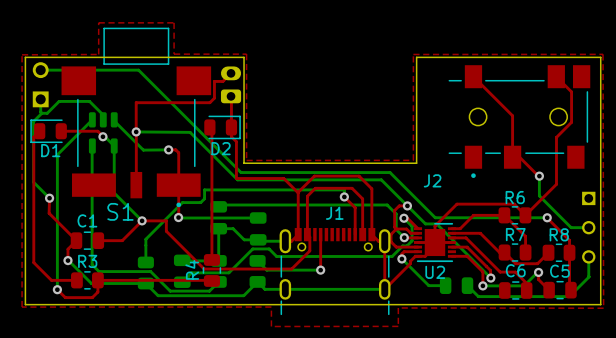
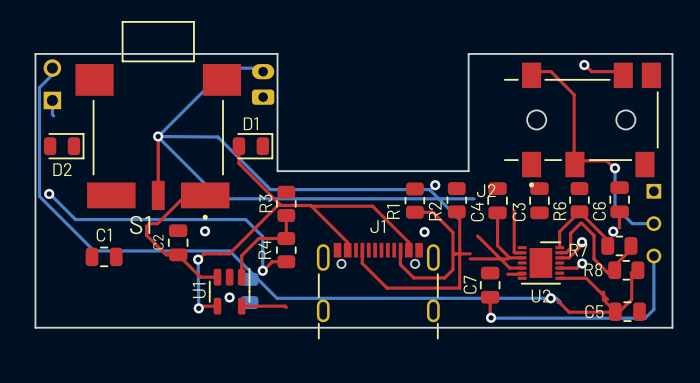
top zone outline: (98, 22) (98, 54) (22, 54) (22, 307) (271, 307) (271, 326) (398, 326) (398, 307) (603, 308) (603, 54) (413, 54) (413, 160) (246, 160) (246, 54) (174, 54) (174, 22) (98, 22) -> none
top track: none -> (584, 65) (591, 71) (622, 71)
via: none -> (584, 65)
bottom track: (40, 70) (138, 70) (241, 172) (390, 172) (435, 217) (547, 217) -> none
bottom track: none -> (261, 68) (226, 68) (157, 136) (219, 198) (474, 198)
top track: (231, 73) (222, 81) (214, 81) (214, 98) (209, 102) (136, 102) (136, 131) -> none
top track: none -> (530, 71) (551, 71) (574, 94) (574, 160) (606, 160) (614, 168)
bottom track: none -> (51, 75) (39, 87) (39, 196) (94, 250) (229, 250) (277, 298) (556, 298) (558, 302) (560, 302) (558, 300)
top track: (473, 76) (512, 115) (512, 157) (519, 157) (538, 176) -> none
top track: (556, 76) (571, 91) (571, 122) (556, 137) (556, 184) (525, 215) (514, 204) (456, 204) (434, 226) (434, 246) (425, 256) (415, 256) (384, 289) (384, 241) (378, 241) (371, 234) (371, 188) (359, 176) (314, 176) (298, 192) (298, 234) (291, 241) (285, 241) -> none
top track: (231, 96) (231, 136) (236, 141) (236, 178) (283, 178) (298, 192) -> none
bottom track: (92, 119) (57, 154) (57, 289) -> none
bottom track: (103, 119) (103, 115) (89, 101) (59, 101) (47, 113) (41, 113) (33, 121) (33, 182) (49, 198) -> none
bottom track: (114, 119) (143, 150) (168, 150) -> none
top track: (209, 127) (211, 129) (211, 259) -> none
D2 position: (222, 127) -> (64, 146)
top track: (39, 131) (33, 137) (33, 262) (51, 280) (76, 280) -> none
D1 rotation: 0° (48, 131) -> 180° (252, 146)
D1 position: (48, 131) -> (252, 146)
U1 side: bottom (103, 132) -> top (229, 291)
top track: (64, 134) (61, 131) (97, 131) (102, 136) -> none
bottom track: (102, 136) (114, 146) (114, 193) (142, 220) -> none
via: (102, 136) -> none
top track: none -> (238, 146) (238, 163) (280, 205) (310, 205) (347, 242) (347, 252)
bottom track: (92, 146) (92, 264) (98, 271) (150, 271) (170, 291) (209, 291) (218, 281) -> none
top track: (168, 149) (175, 149) (178, 152) (178, 217) -> none
via: (168, 149) -> none
bottom track: none -> (615, 168) (615, 206) (632, 223) (653, 223)
via: none -> (435, 185)
bottom track: (539, 176) (539, 195) (571, 227) (588, 227) -> none
via position: (539, 176) -> (615, 168)
bottom track: none -> (49, 193) (75, 219) (245, 219) (262, 236) (262, 270)
top track: none -> (205, 195) (185, 195) (157, 223) (149, 223) (146, 226) (146, 235) (166, 254) (178, 254) (200, 277) (217, 277)
C3: none -> (539, 200)
top track: none -> (280, 204) (229, 253) (204, 253) (198, 259)
top track: none -> (311, 206) (372, 206) (408, 242) (408, 252)
top track: (344, 196) (355, 207) (355, 234) -> none
bottom track: (344, 196) (344, 189) (204, 189) (204, 198) (200, 202) (182, 202) (145, 239) (145, 262) -> none
via: (344, 196) -> none
R6 name position: R6 (515, 197) -> R6 (559, 211)
via position: (49, 198) -> (49, 193)
top track: none -> (514, 210) (514, 252) (522, 252)
part position: (588, 198) -> (653, 191)
top track: (49, 199) (49, 213) (76, 240) (67, 249) (67, 260) -> none
top track: none -> (456, 211) (459, 214) (459, 288) (387, 288) (362, 263) (362, 252)
top track: none -> (619, 211) (619, 227)
top track: none -> (414, 212) (432, 212) (452, 232) (452, 269) (444, 277) (413, 277) (400, 264) (400, 252)
top track: none -> (497, 212) (497, 245) (509, 257) (522, 257)
top track: none -> (286, 215) (286, 238) (258, 238) (241, 255) (241, 277)
top track: (407, 205) (399, 205) (394, 210) (394, 227) (396, 229) -> none
bottom track: (407, 205) (425, 223) (436, 223) (490, 278) -> none
via: (407, 205) -> none
bottom track: (218, 206) (220, 204) (387, 204) (396, 214) (396, 229) (404, 237) -> none
part: none -> (653, 223)
R6 rotation: 0° (514, 215) -> 90° clockwise (579, 200)
R6 position: (514, 215) -> (579, 200)
bottom track: (178, 217) (258, 218) -> none
C4 side: bottom (218, 217) -> top (497, 200)
via: none -> (424, 232)
top track: (403, 218) (407, 218) (418, 228) -> none
bottom track: (403, 218) (412, 226) (412, 240) (407, 245) (402, 245) (392, 256) (276, 256) (269, 248) (252, 248) (228, 272) (191, 272) (182, 282) -> none
via: (403, 218) -> none
top track: (547, 218) (569, 240) (570, 290) (570, 285) -> none
via: (142, 220) -> none
top track: none -> (477, 235) (509, 268) (522, 268)
top track: none -> (582, 242) (582, 244) (569, 257) (559, 257)
via: none -> (582, 242)
part: (588, 227) -> none
C2 side: bottom (258, 228) -> top (178, 242)
top track: (451, 228) (460, 228) (473, 215) (504, 215) (525, 236) (525, 252) -> none
top track: (396, 229) (406, 229) (410, 233) (418, 233) -> none
top track: (396, 229) (391, 234) (391, 241) (396, 247) (418, 247) -> none
top track: none -> (607, 245) (607, 240) (579, 211) (559, 231) (559, 247)
top track: none -> (630, 245) (630, 249) (607, 272) (594, 259) (594, 235) (580, 223) (570, 233) (570, 248) (566, 252) (559, 252)
top track: (451, 233) (480, 233) (499, 252) (504, 252) (515, 263) (537, 263) (548, 252) -> none
top track: (320, 234) (320, 270) -> none
top track: (362, 234) (362, 198) (352, 188) (315, 188) (307, 196) (307, 234) (309, 237) (309, 250) (291, 269) (204, 269) (166, 231) (166, 220) (142, 220) (122, 240) (98, 240) -> none
R8 name position: R8 (559, 234) -> R8 (593, 269)
via: (404, 237) -> none
top track: (451, 237) (465, 237) (500, 272) (515, 272) (526, 283) (526, 290) -> none
bottom track: none -> (653, 256) (653, 309) (645, 318) (491, 317)
part: none -> (653, 256)
bottom track: (285, 241) (244, 239) (233, 228) (218, 228) (218, 260) (182, 260) -> none
U2 position: (434, 242) -> (540, 262)
bottom track: none -> (198, 259) (198, 308)
via: none -> (198, 259)
top track: none -> (286, 261) (272, 261) (263, 270)
top track: none -> (581, 263) (576, 268) (559, 268)
via: none -> (582, 263)
top track: (451, 247) (467, 247) (490, 270) (490, 278) (490, 274) -> none
top track: (418, 251) (404, 251) (401, 258) -> none
R7 position: (515, 252) -> (619, 245)
via: none -> (262, 270)
top track: none -> (630, 272) (631, 299) (618, 312) (569, 312) (558, 302)
top track: (467, 256) (482, 271) (482, 285) -> none
bottom track: (588, 256) (589, 276) (569, 296) (478, 296) (467, 285) -> none
part: (588, 256) -> none
via: (401, 258) -> none
bottom track: (402, 258) (428, 285) (445, 285) -> none
top track: none -> (559, 278) (586, 278) (607, 299)
via: (67, 260) -> none
bottom track: (68, 260) (91, 283) (145, 283) (158, 295) (243, 295) (257, 281) (265, 289) (384, 289) -> none
bottom track: (257, 260) (266, 270) (320, 270) -> none
R3 name position: R3 (87, 261) -> R3 (265, 203)
R4 position: (211, 270) -> (286, 250)
via: (320, 270) -> none
C6 name position: C6 (515, 270) -> C6 (599, 211)
part: (182, 271) -> none
R2 side: bottom (257, 271) -> top (456, 200)
bottom track: (538, 271) (524, 285) (482, 285) -> none
C5 name position: C5 (559, 271) -> C5 (594, 311)
via: (538, 272) -> none
R1 side: bottom (145, 273) -> top (414, 200)
via: none -> (229, 297)
top track: none -> (490, 297) (491, 317)
R3 rotation: 0° (87, 280) -> 90° clockwise (286, 203)
R3 position: (87, 280) -> (286, 203)
top track: (211, 280) (97, 280) (97, 292) (92, 297) (65, 297) (57, 289) -> none
top track: none -> (217, 306) (200, 306) (198, 308)
top track: none -> (241, 306) (286, 307)
C7 side: bottom (456, 285) -> top (490, 285)
via: (482, 285) -> none
via: none -> (198, 308)
via: (57, 289) -> none
C6 rotation: 0° (515, 290) -> 90° clockwise (619, 199)
C6 position: (515, 290) -> (619, 199)
via: none -> (491, 317)

